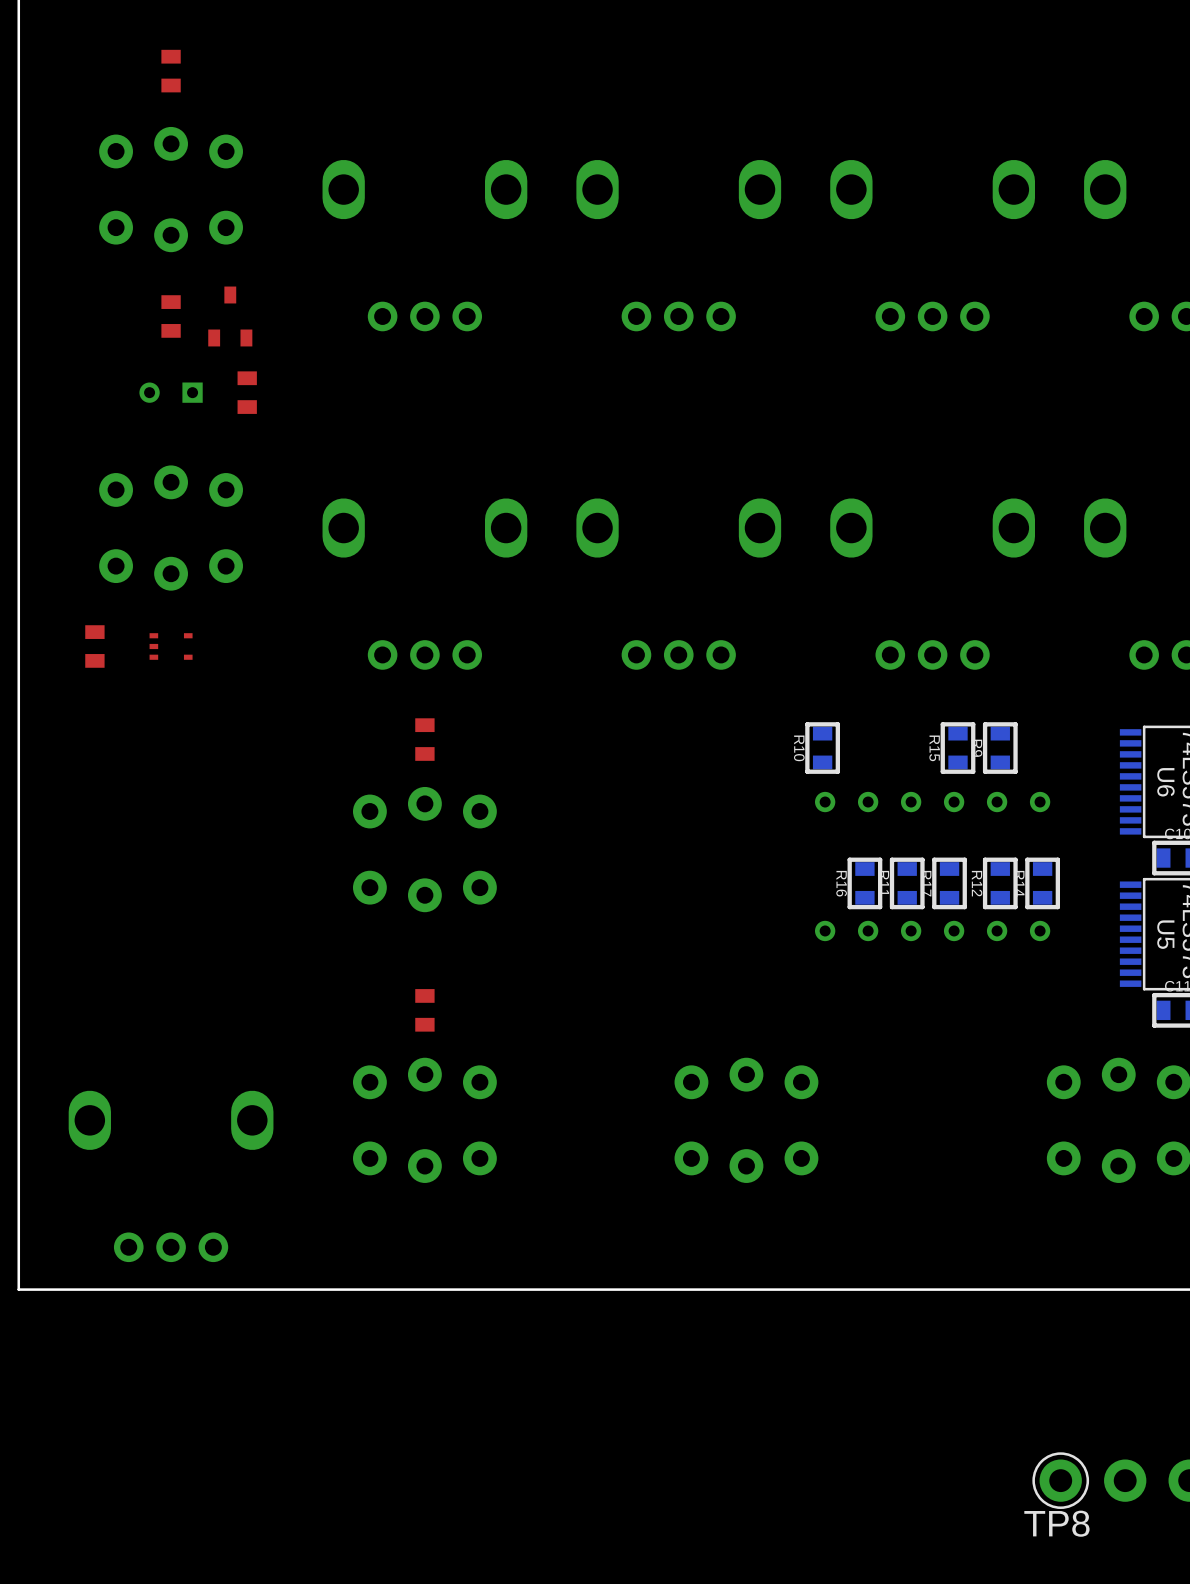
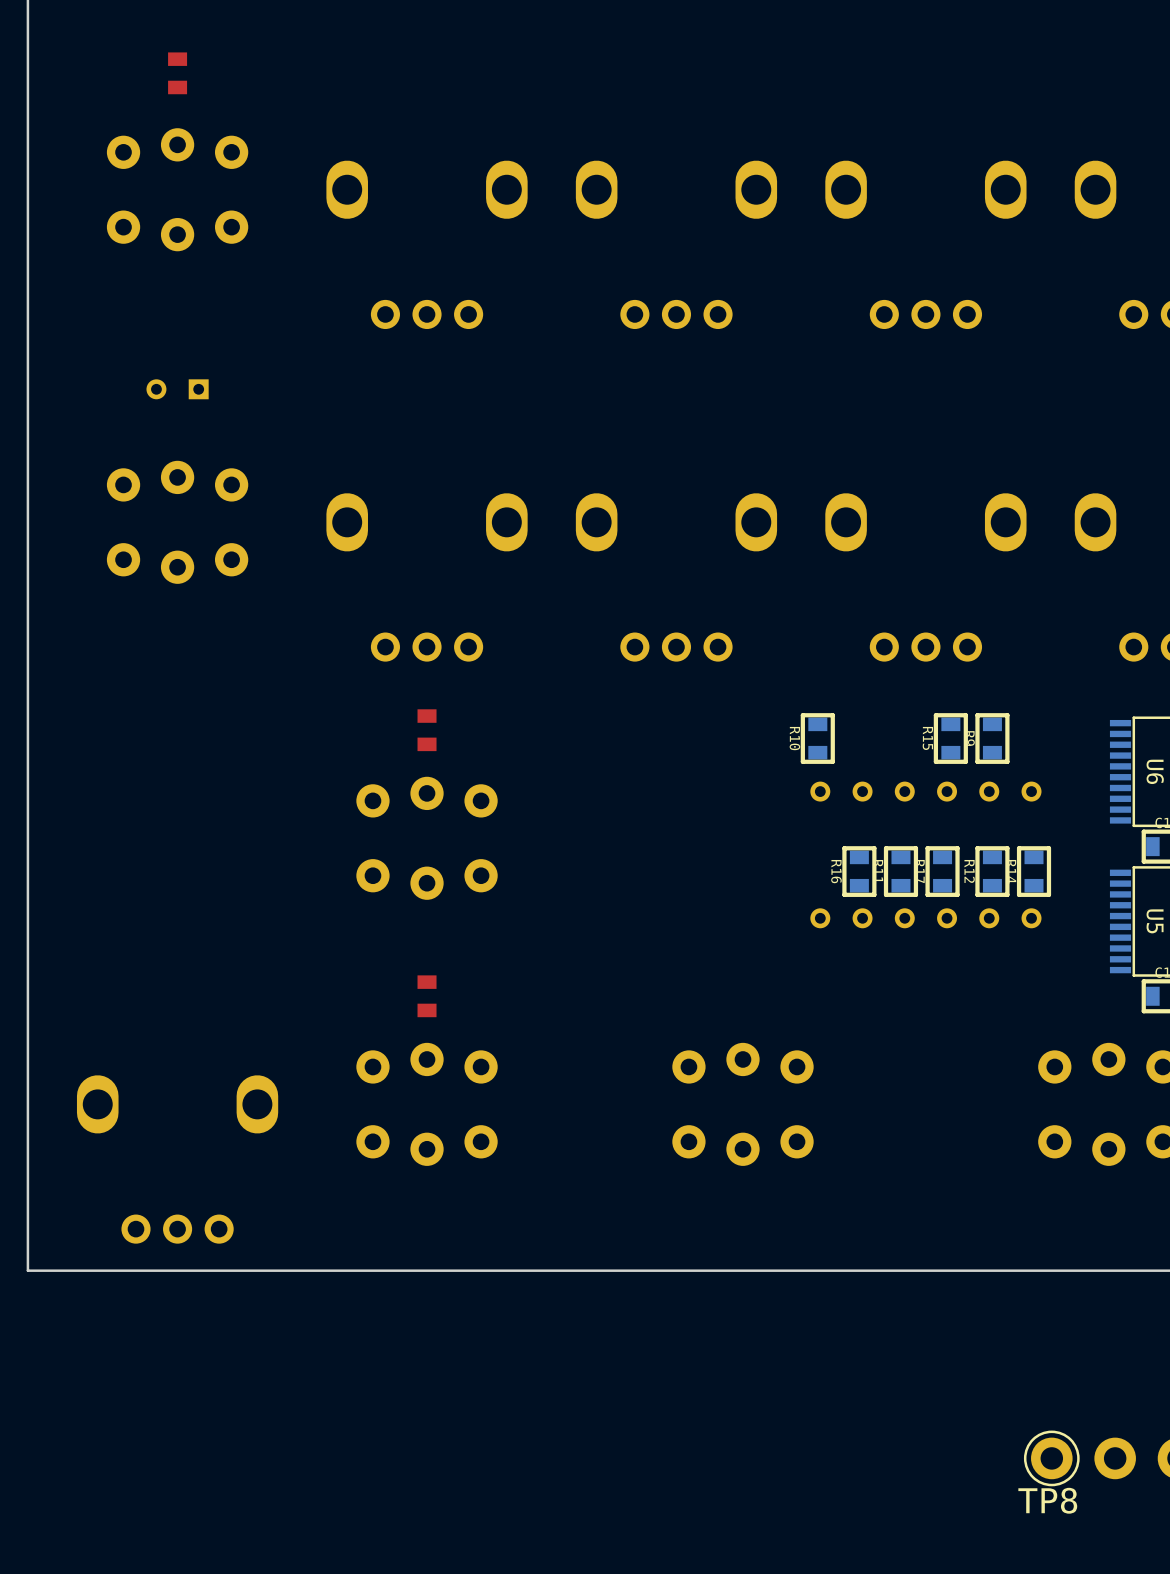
part: (171, 316) -> none
part: (230, 316) -> none
part: (247, 392) -> none
part: (94, 646) -> none
part: (171, 646) -> none

